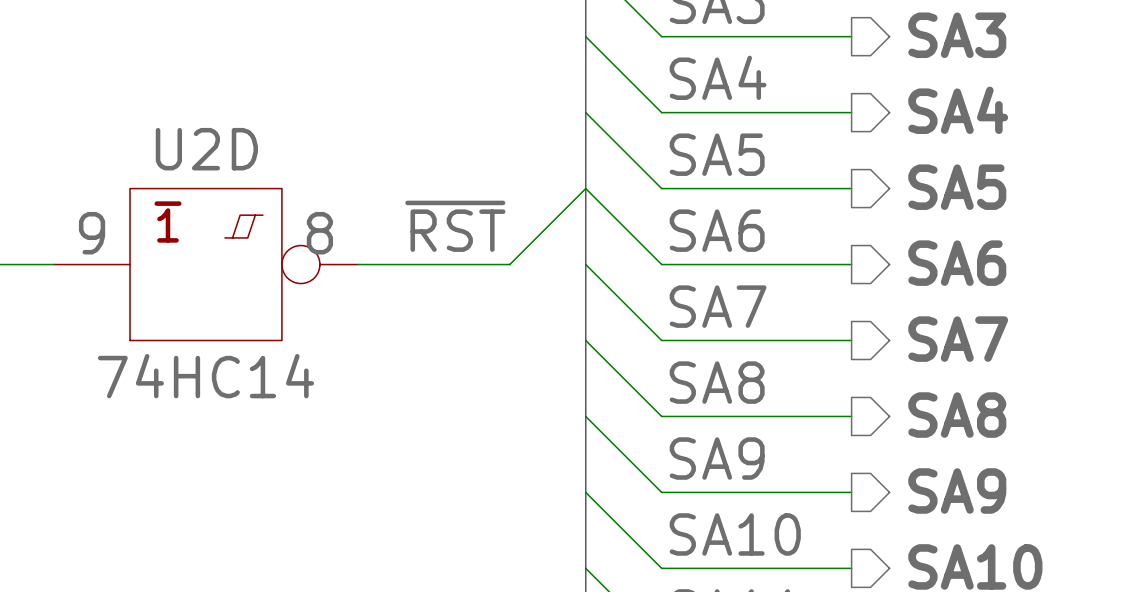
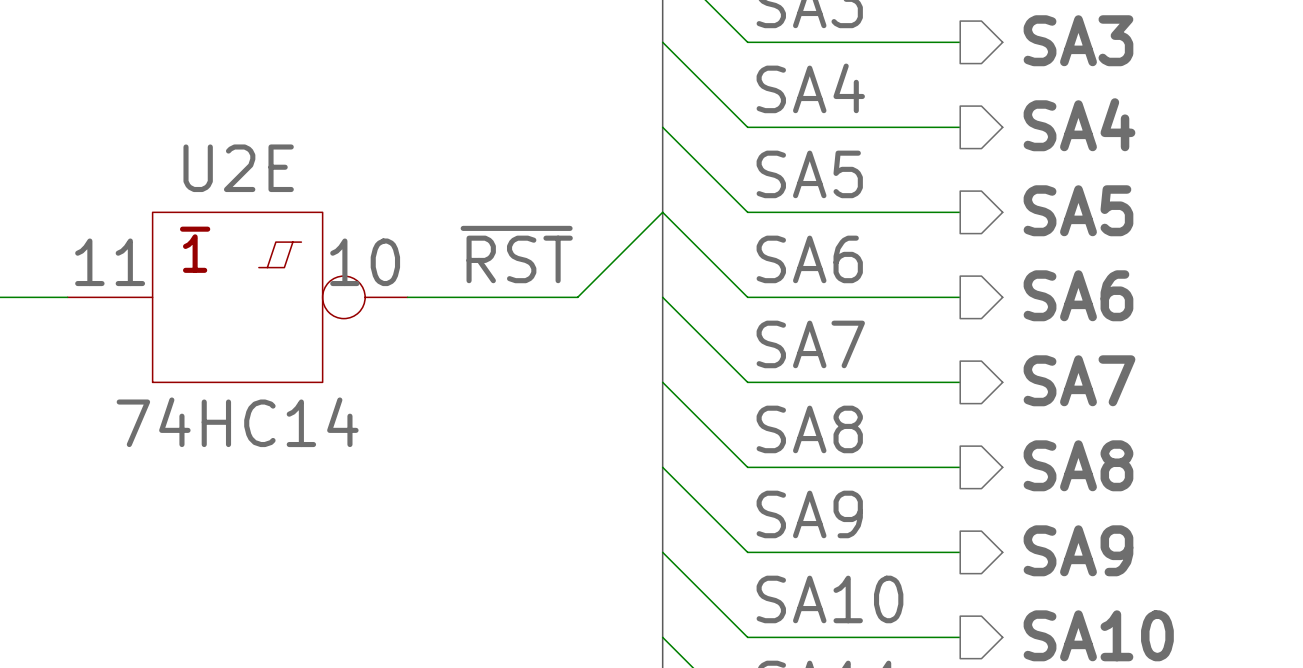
U2D name: U2D (206, 149) -> U2E (238, 168)
U2D pin number: 9 (92, 233) -> 11 (110, 262)
U2D pin number: 8 (319, 233) -> 10 (365, 262)

